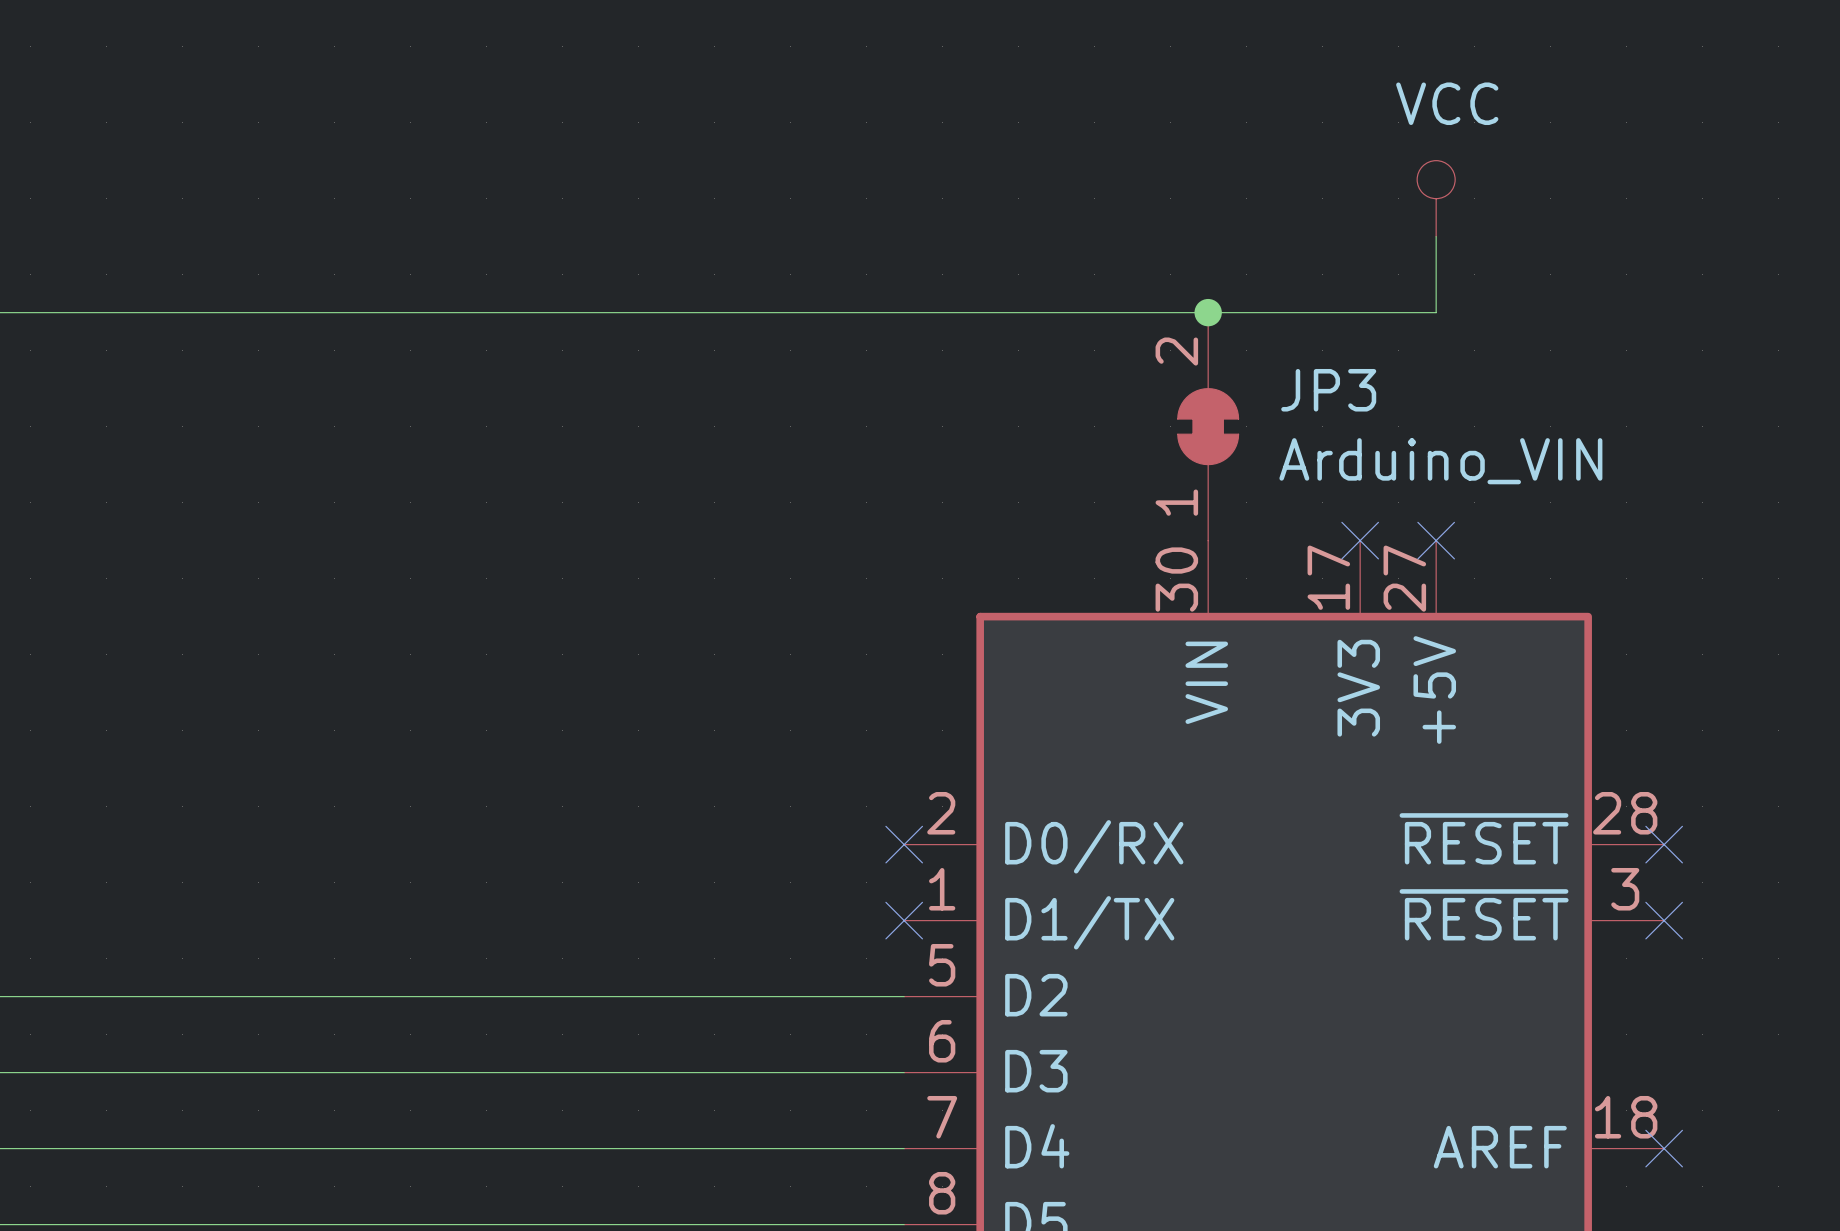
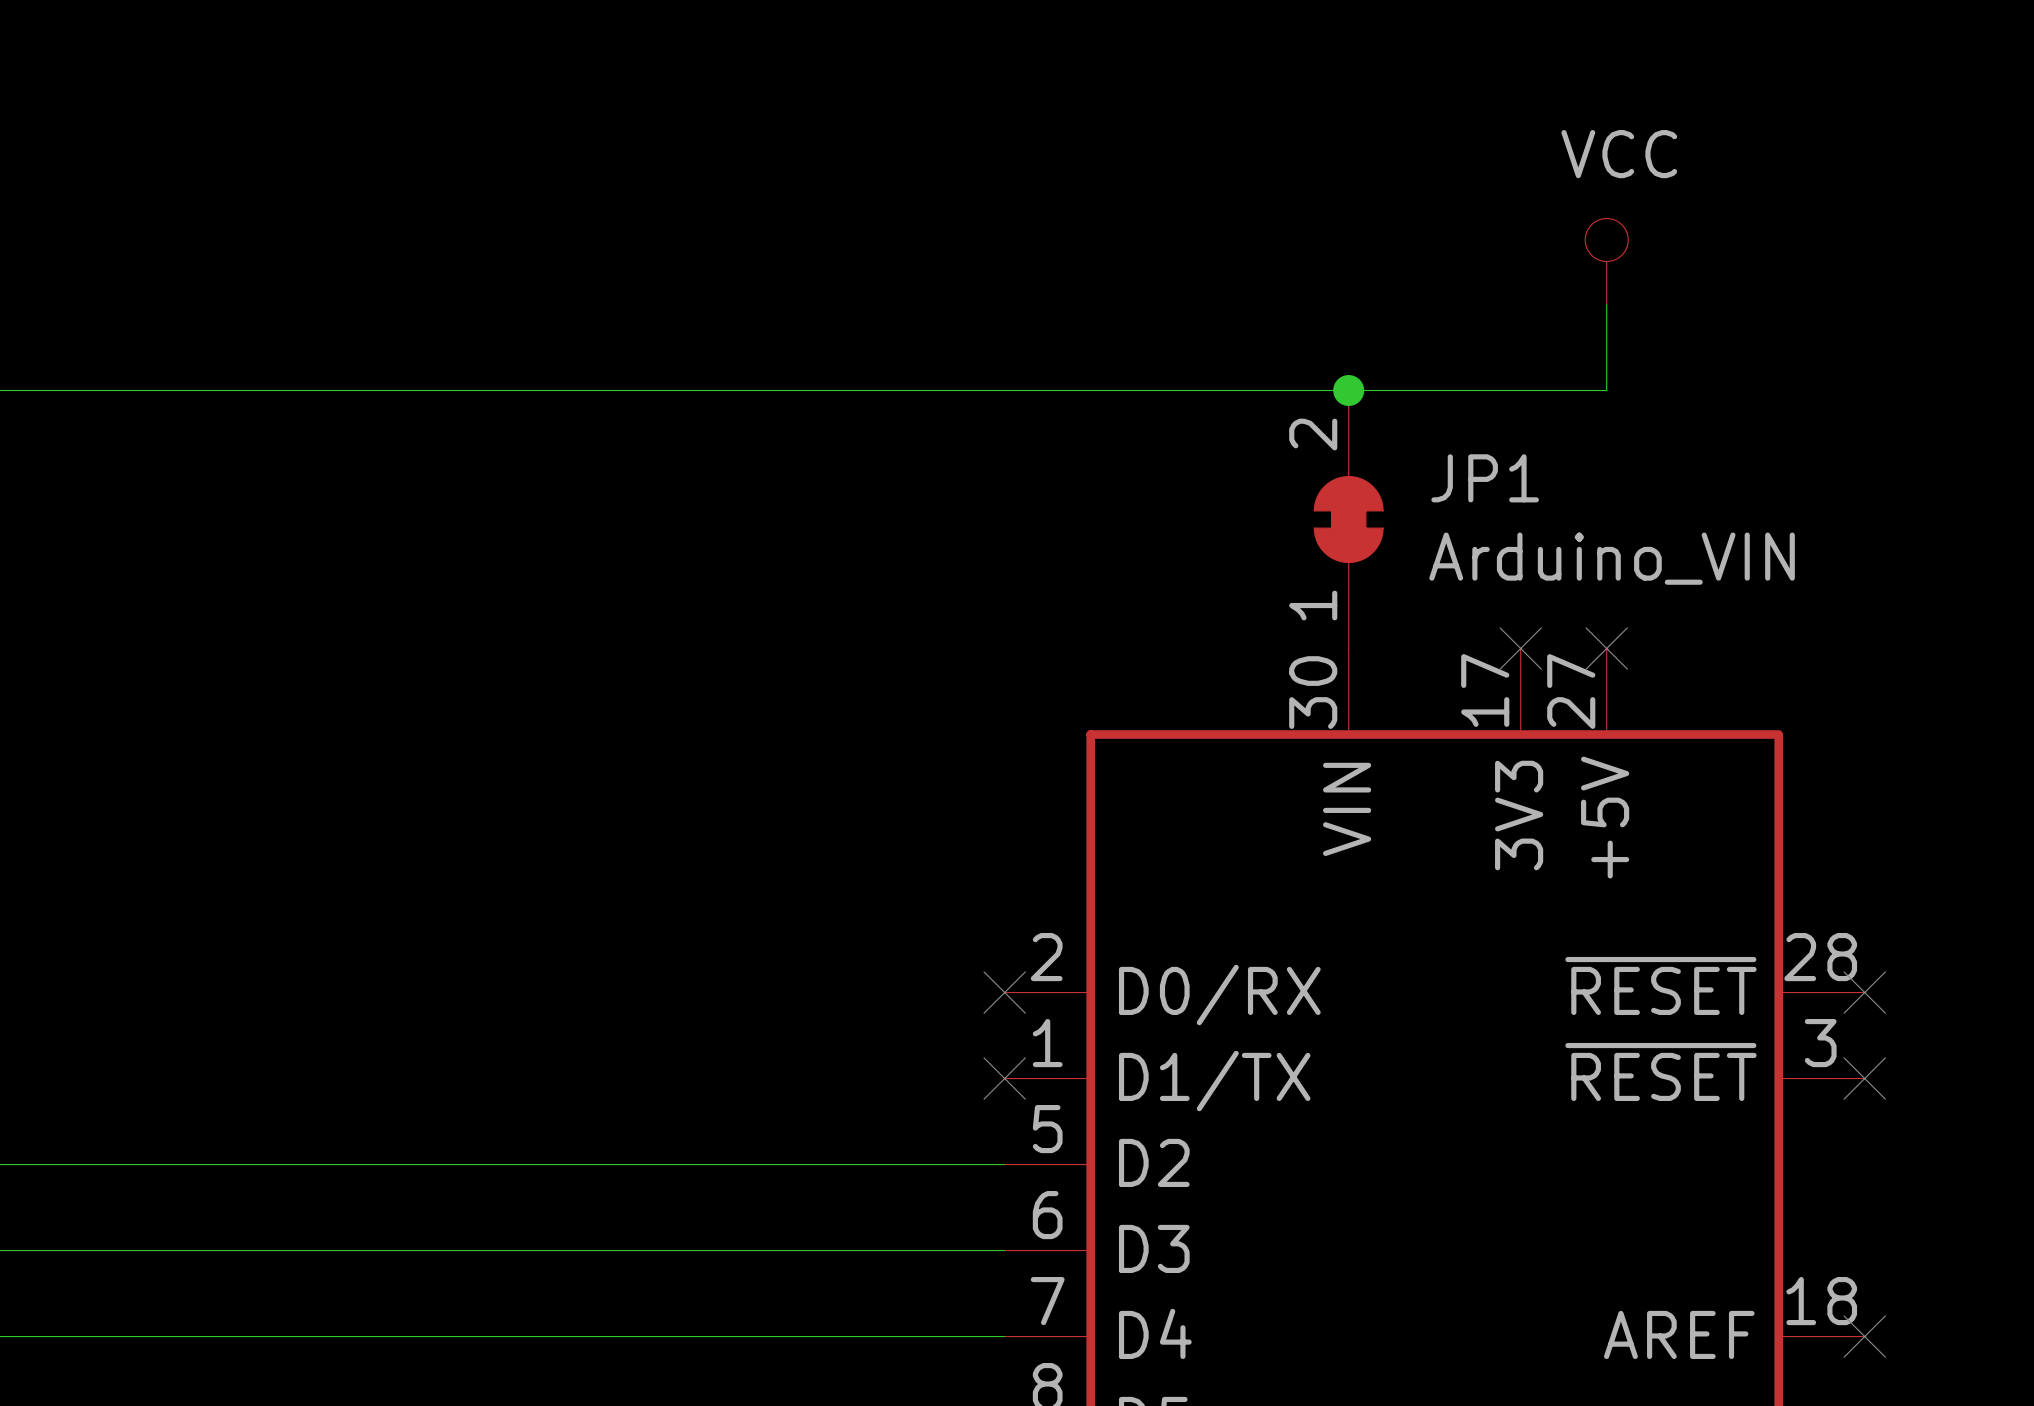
JP3 name: JP3 (1328, 390) -> JP1 (1485, 478)

